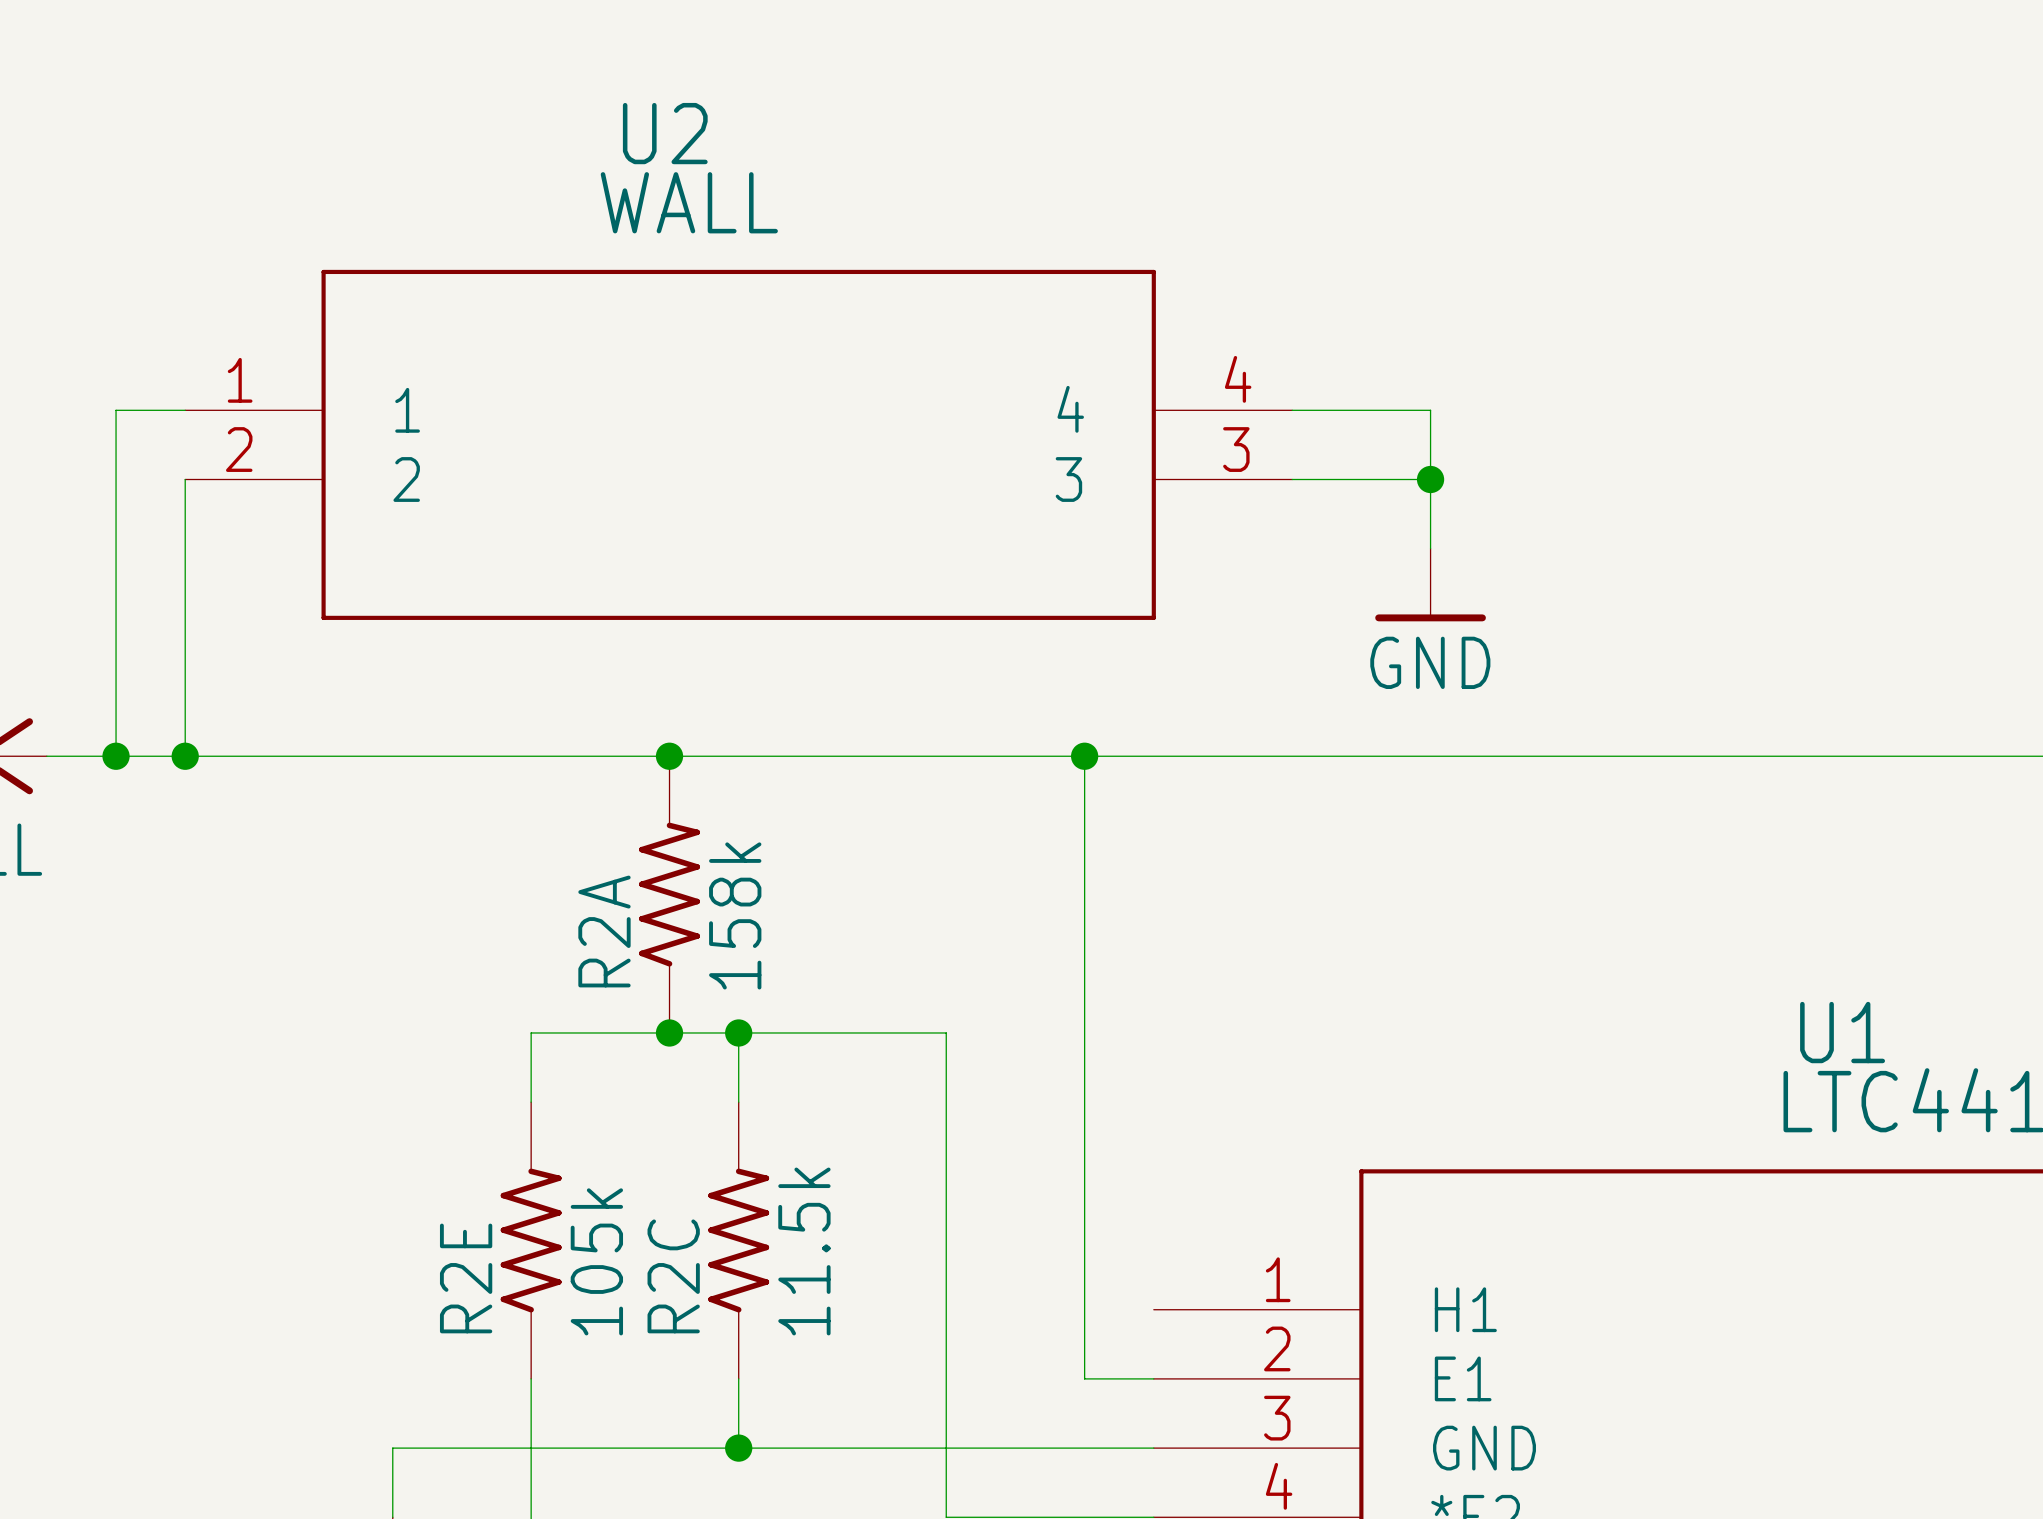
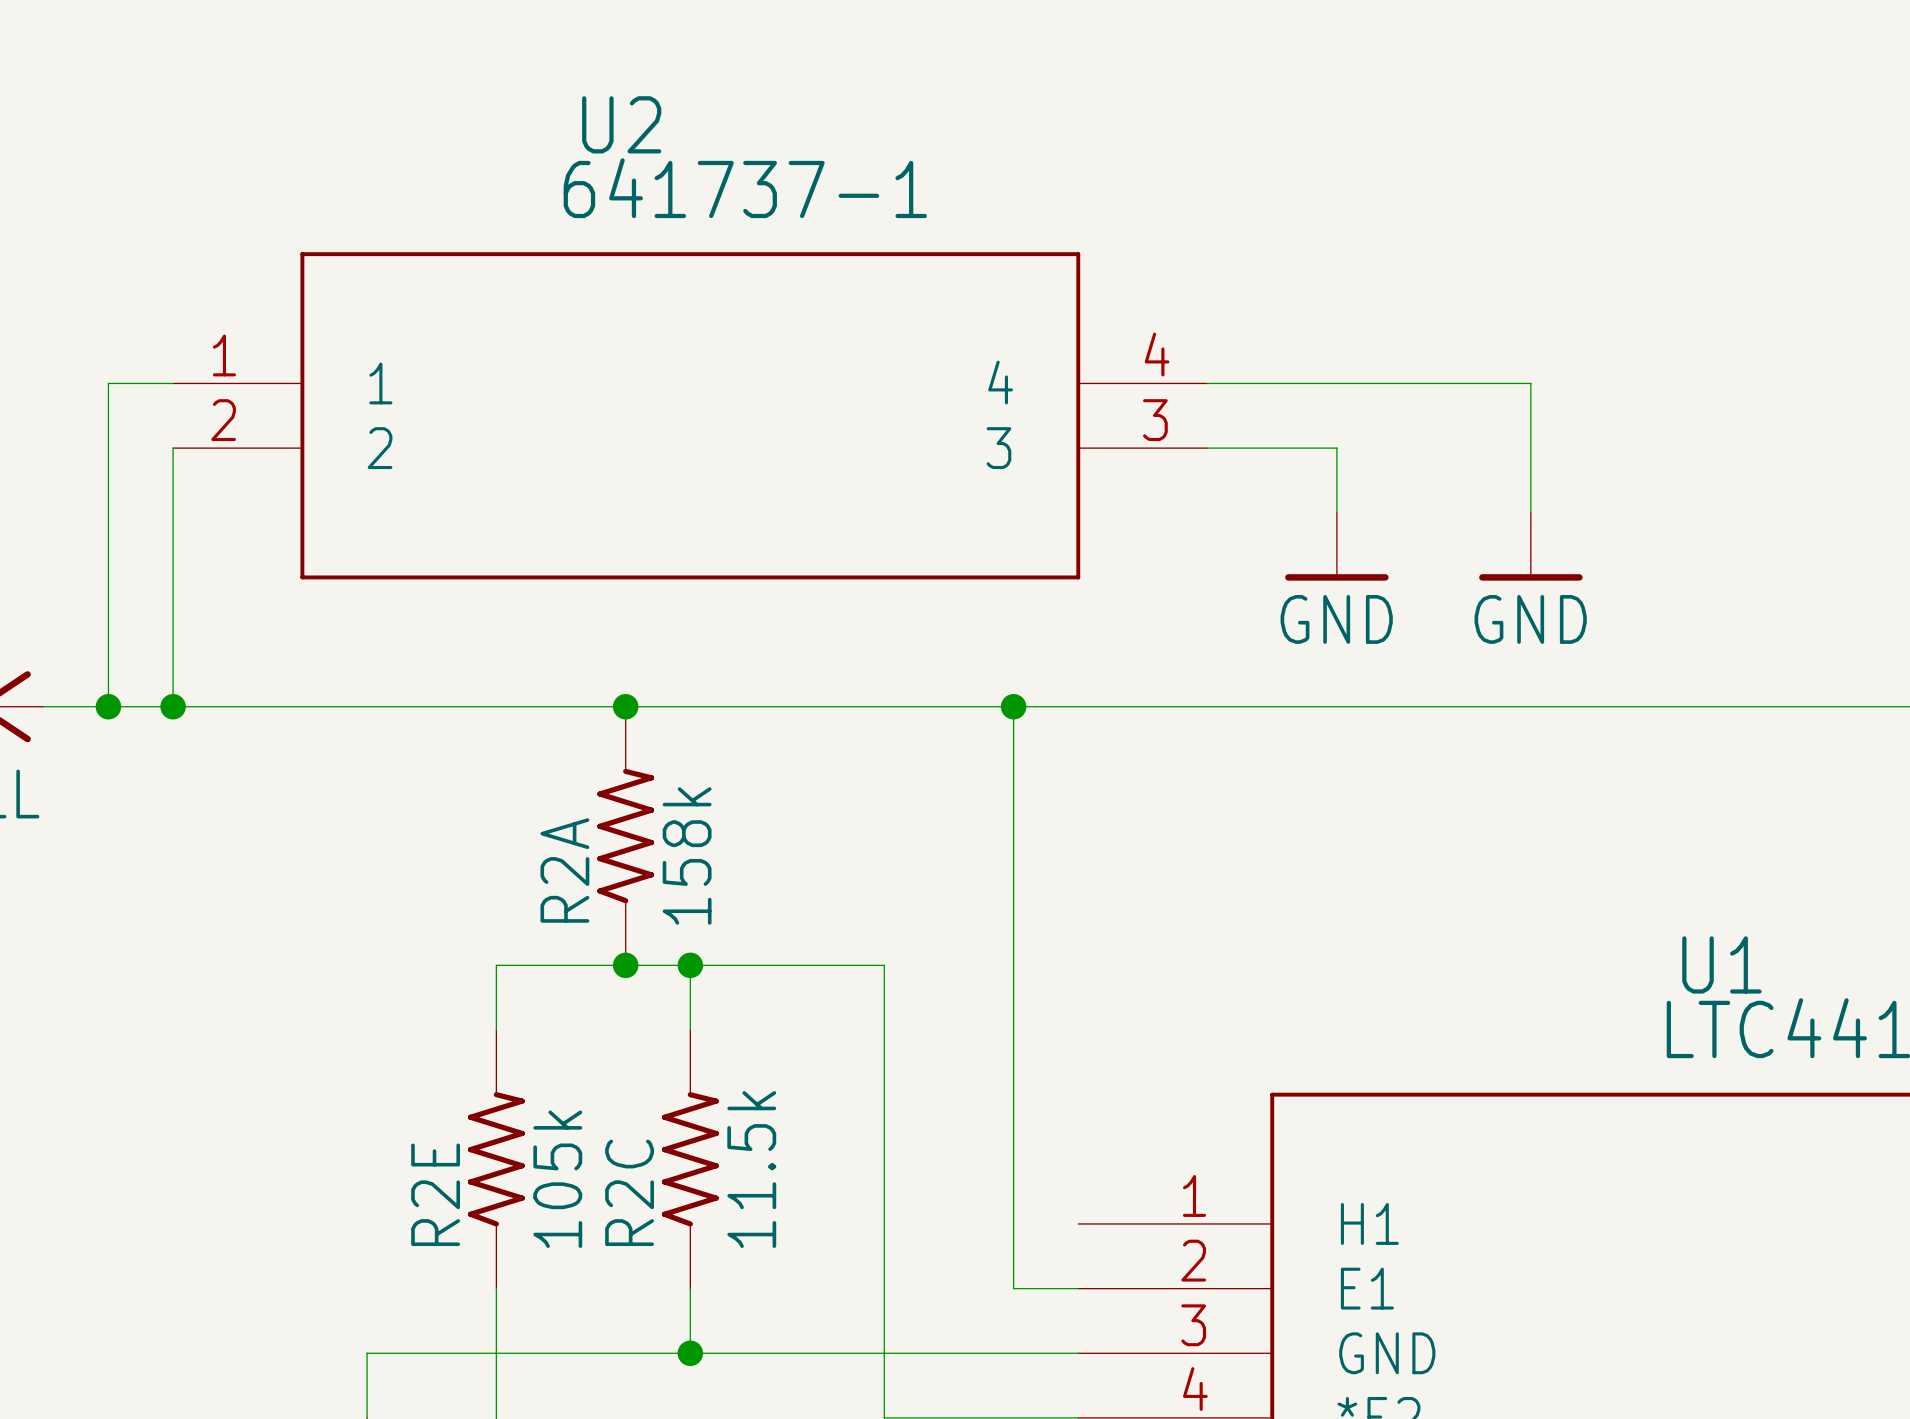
U2 value: WALL (689, 202) -> 641737-1 (745, 188)
wire: (1430, 410) (1430, 479) -> (1336, 383) (1530, 383) (1530, 512)
junction: (1430, 479) -> none
power symbol: none -> GND (1530, 546)

